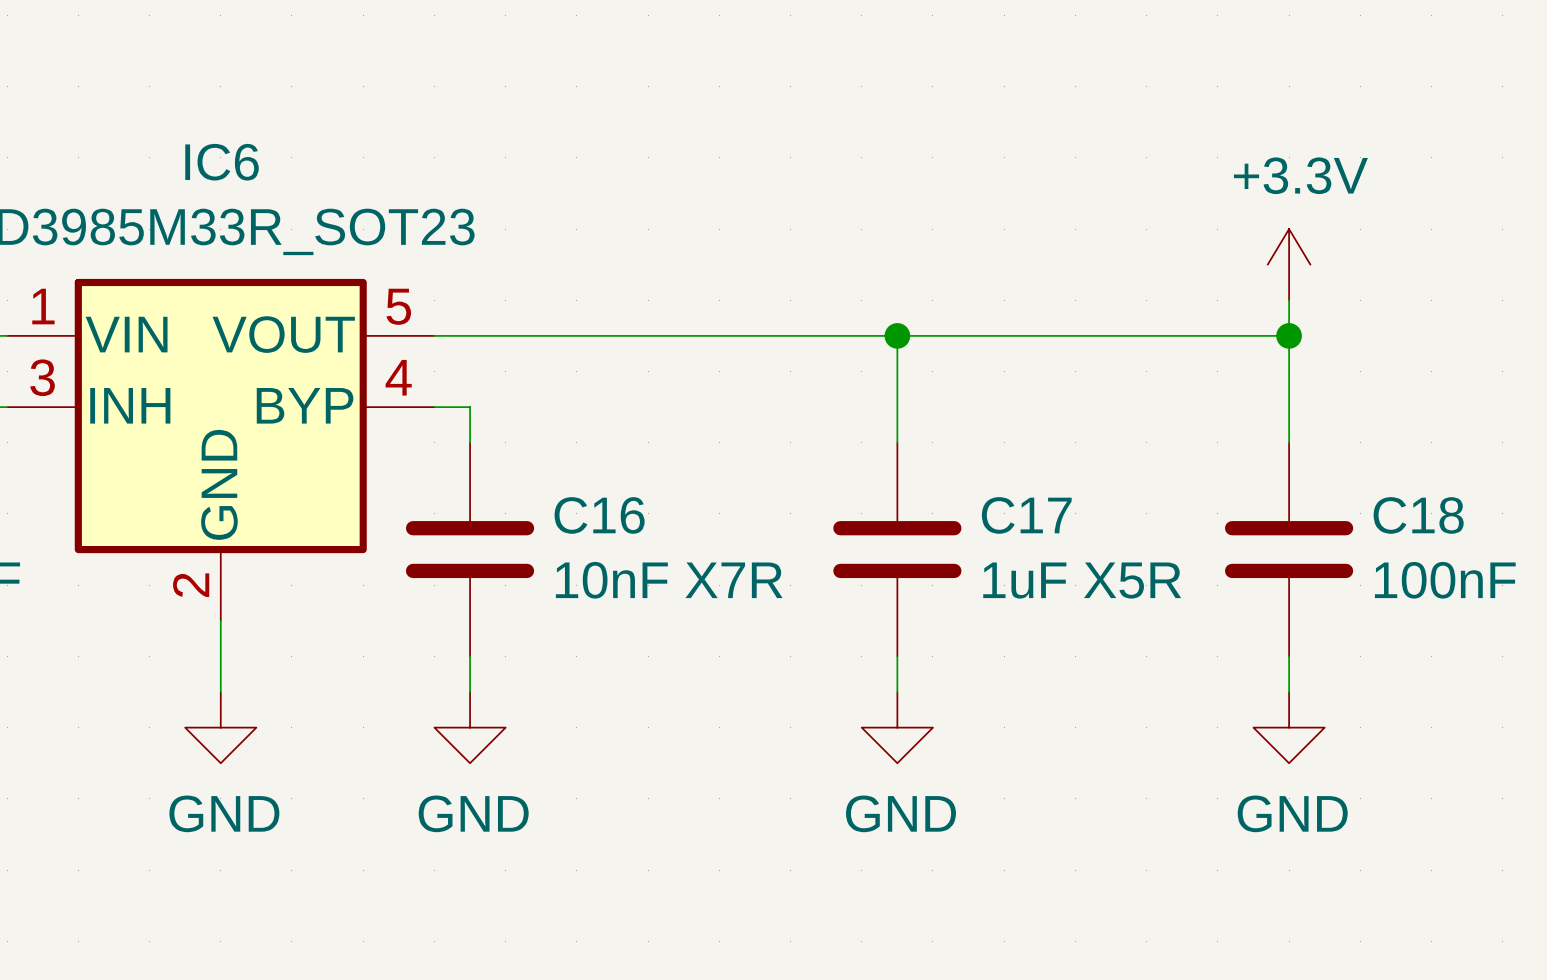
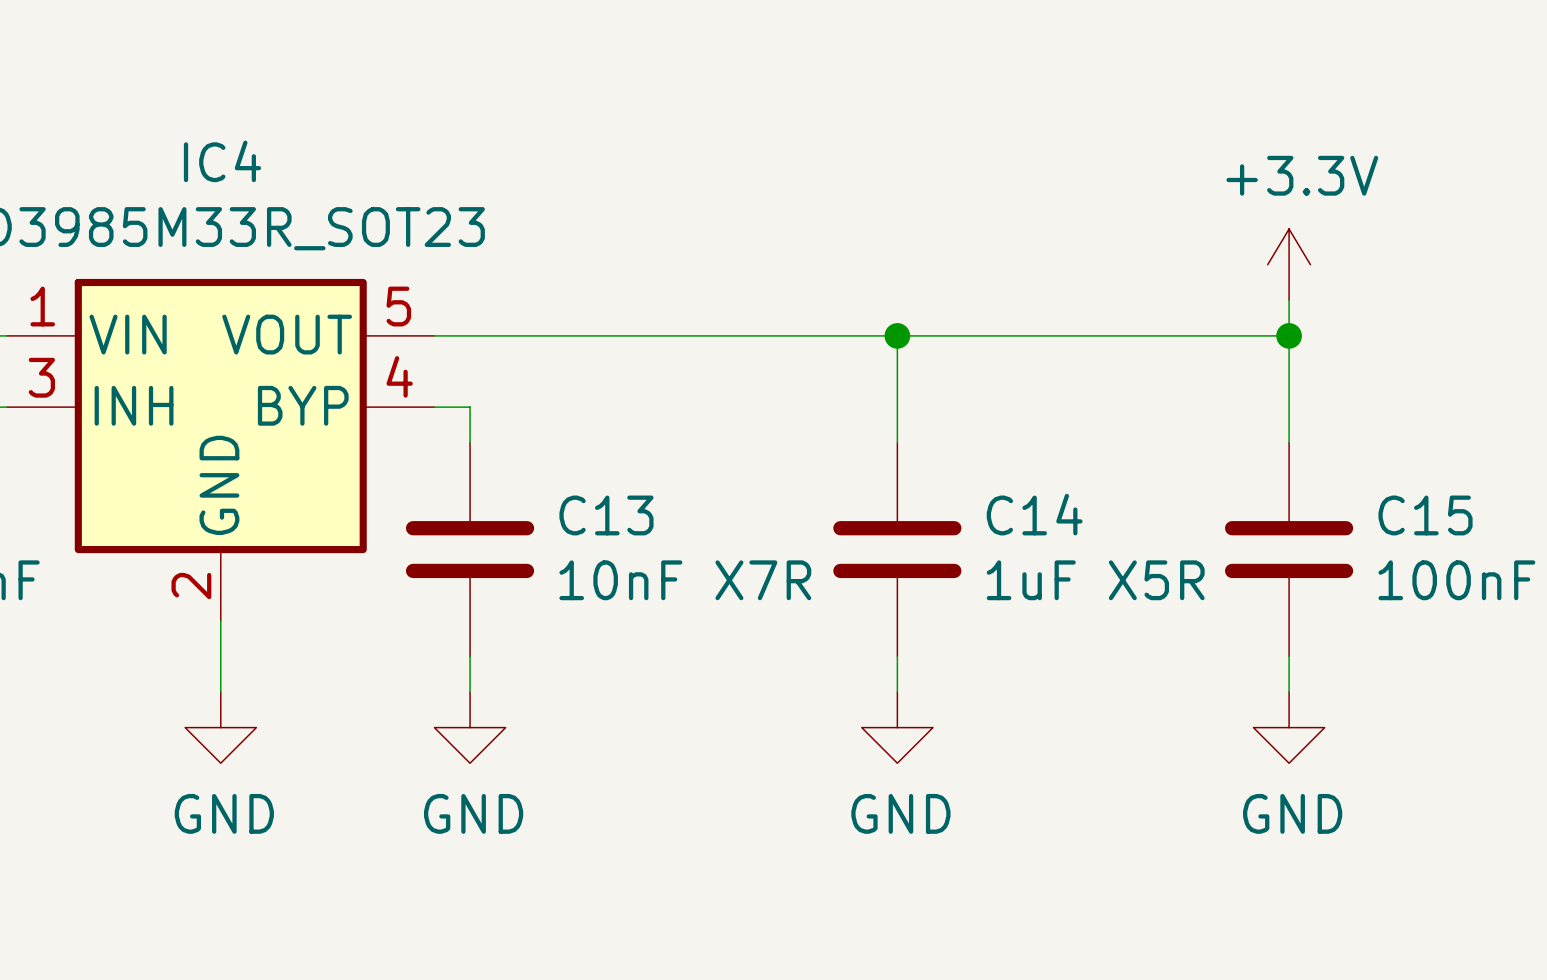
IC6 name: IC6 (222, 162) -> IC4 (222, 161)
C16 name: C16 (599, 515) -> C13 (606, 515)
C17 name: C17 (1026, 515) -> C14 (1034, 514)
C18 name: C18 (1418, 515) -> C15 (1425, 515)

